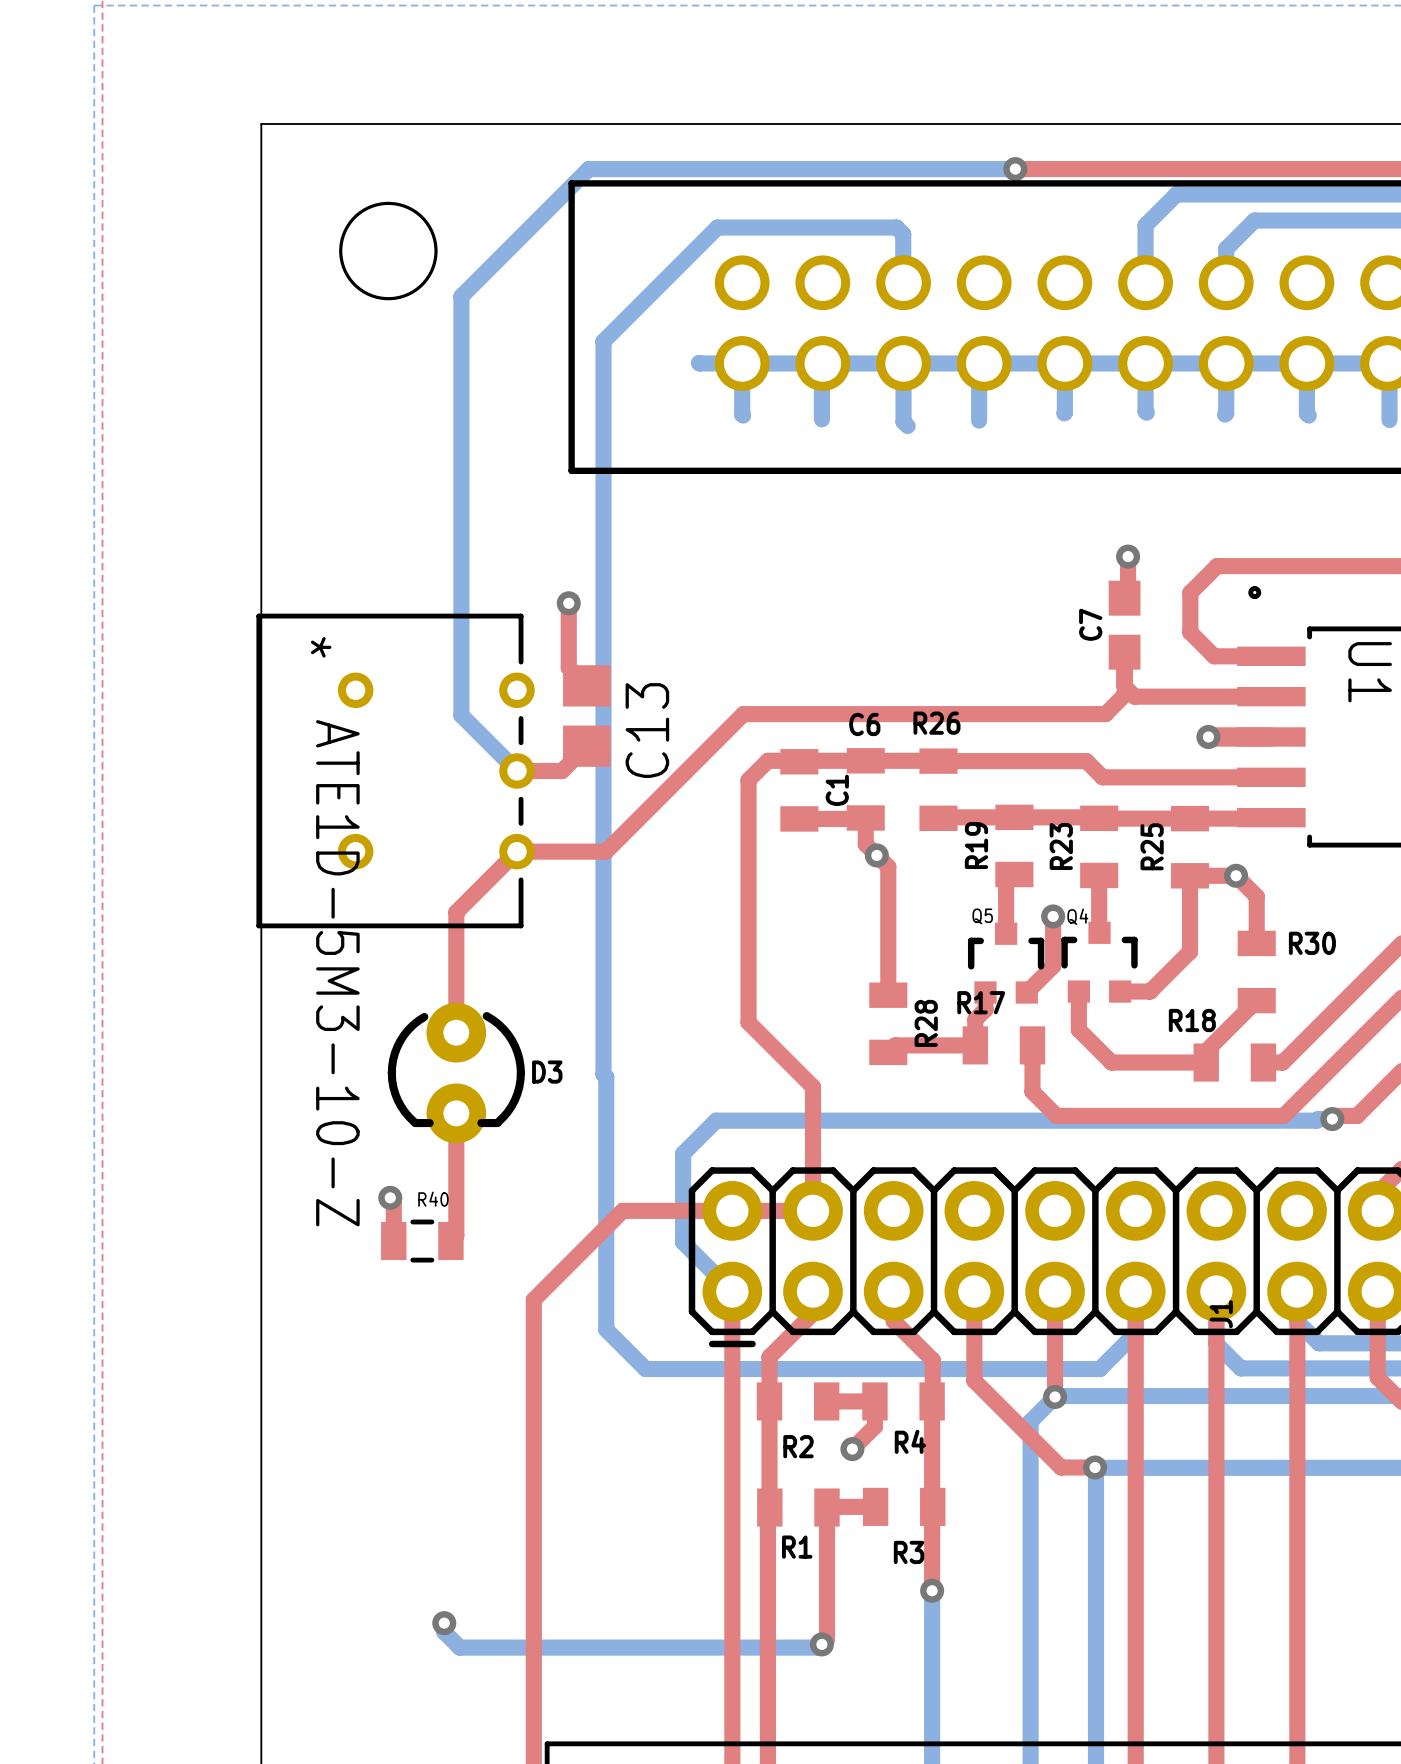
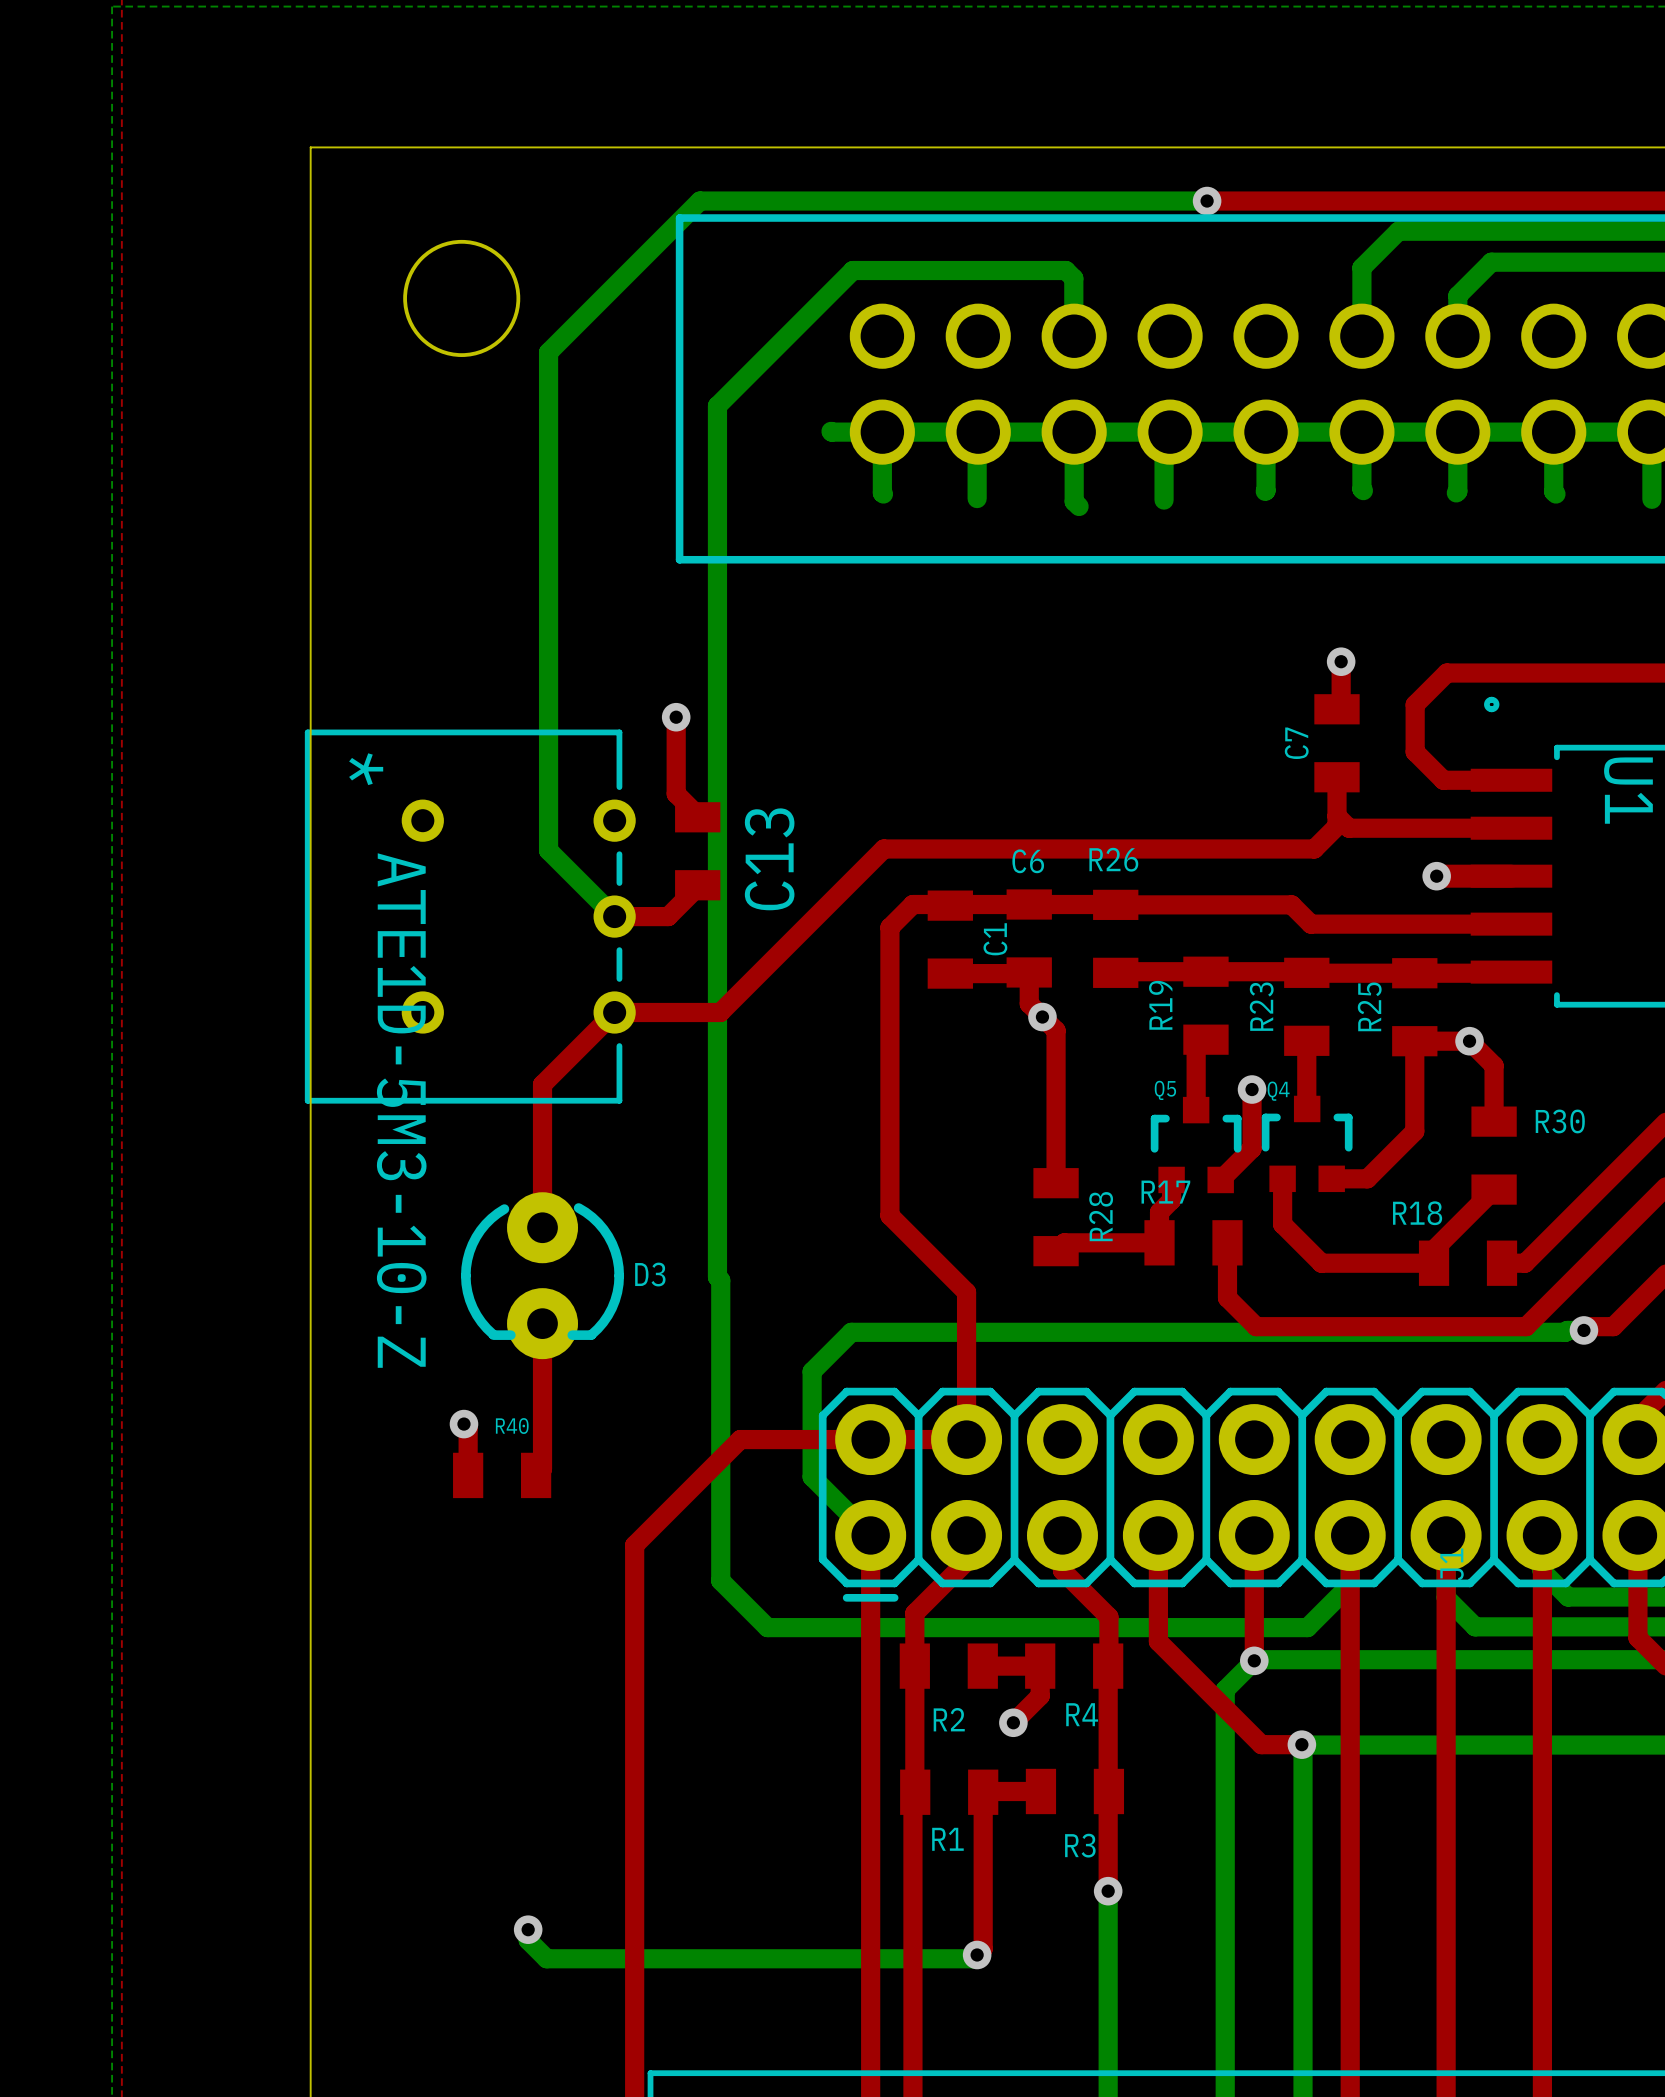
C7 footprint: [1108, 580, 1141, 670] -> [1314, 694, 1360, 793]
C13 footprint: [563, 665, 611, 767] -> [675, 802, 721, 901]
R40 footprint: [381, 1219, 464, 1263] -> [453, 1452, 552, 1499]

